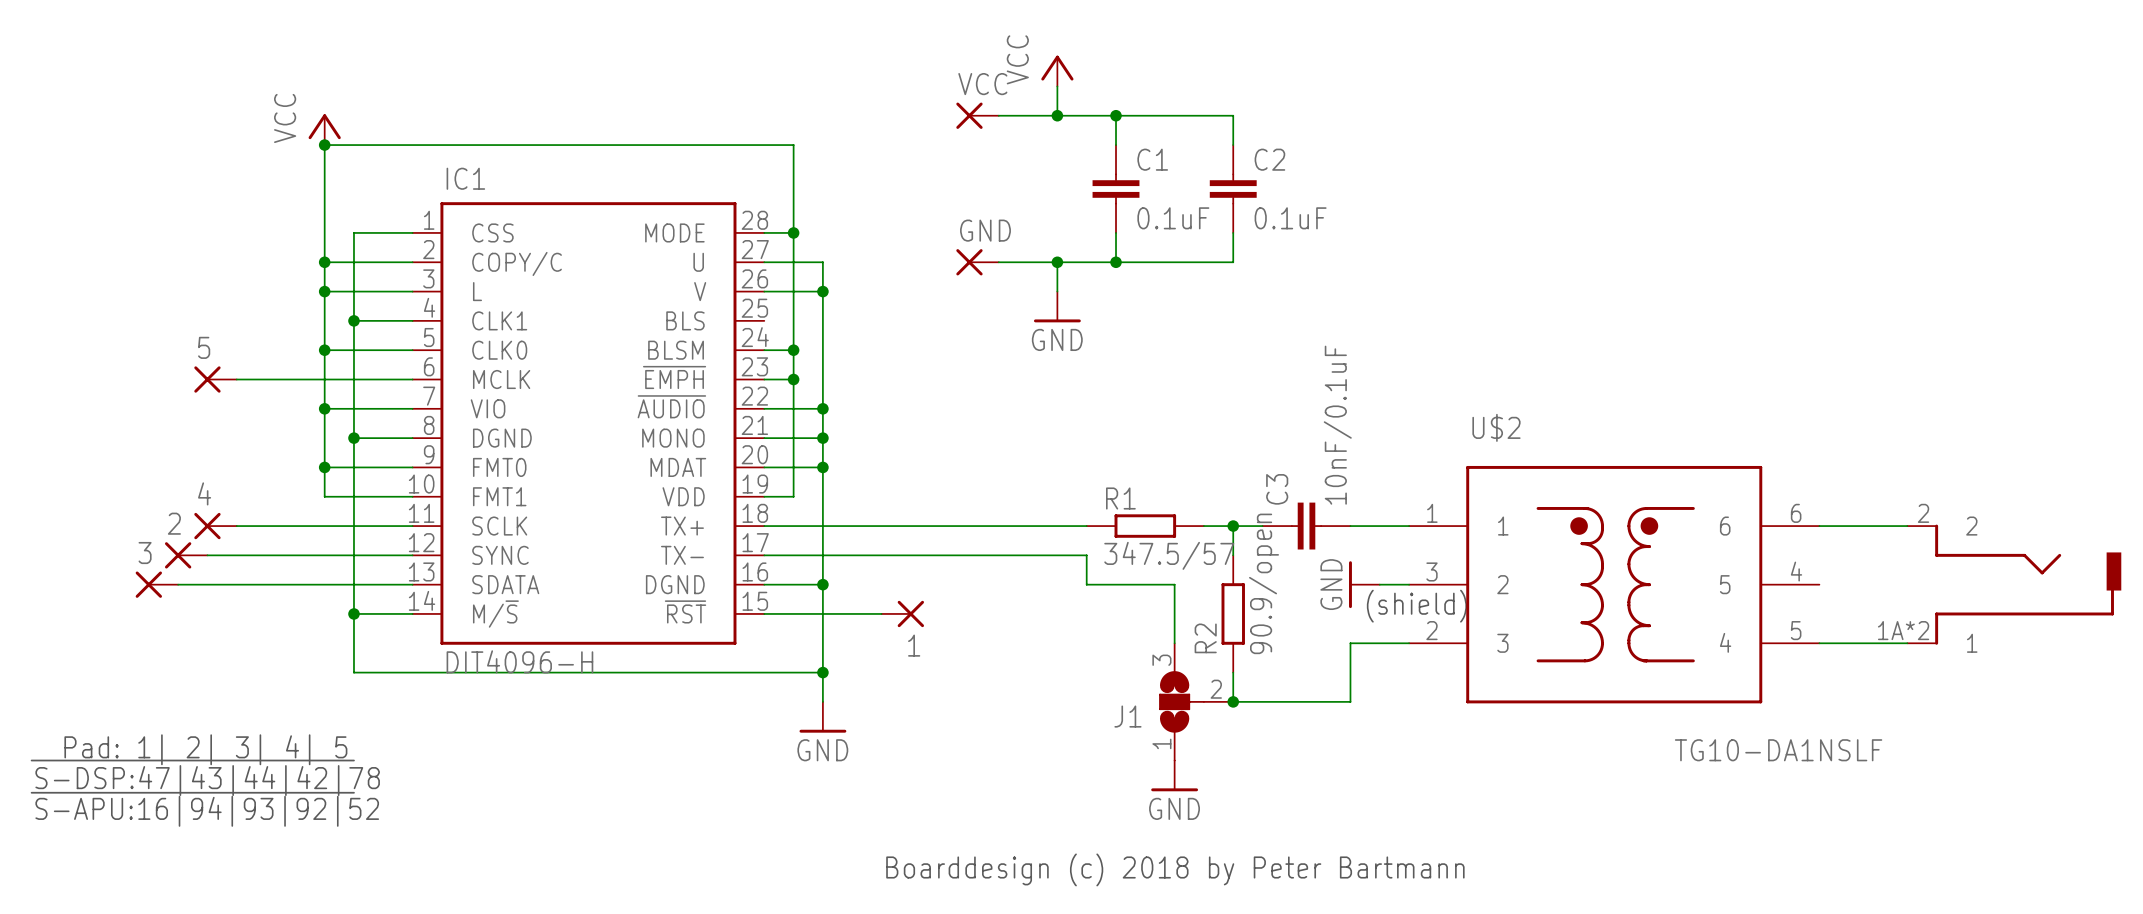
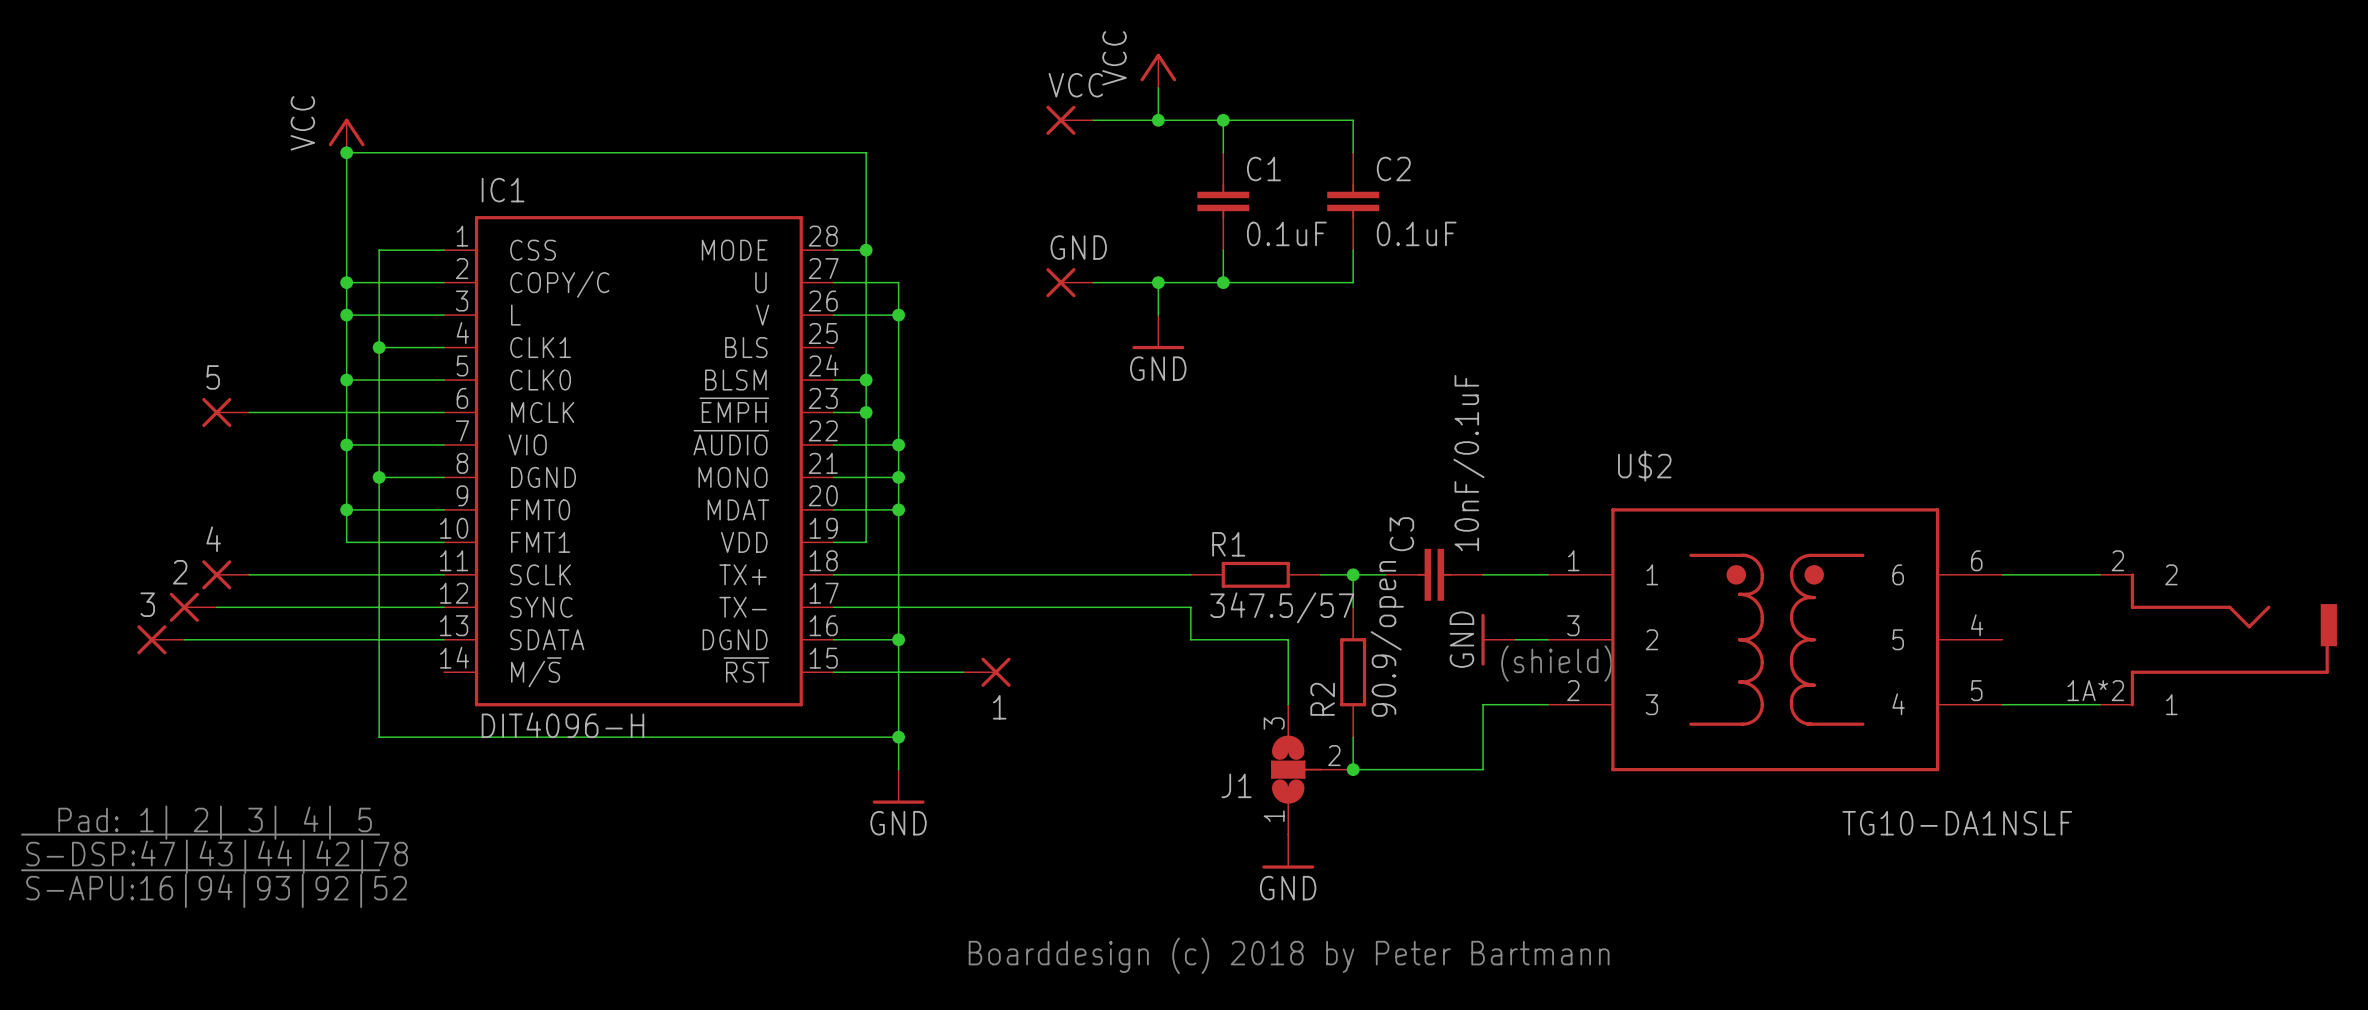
wire: (353, 613) (412, 613) -> none
junction: (353, 613) -> none

